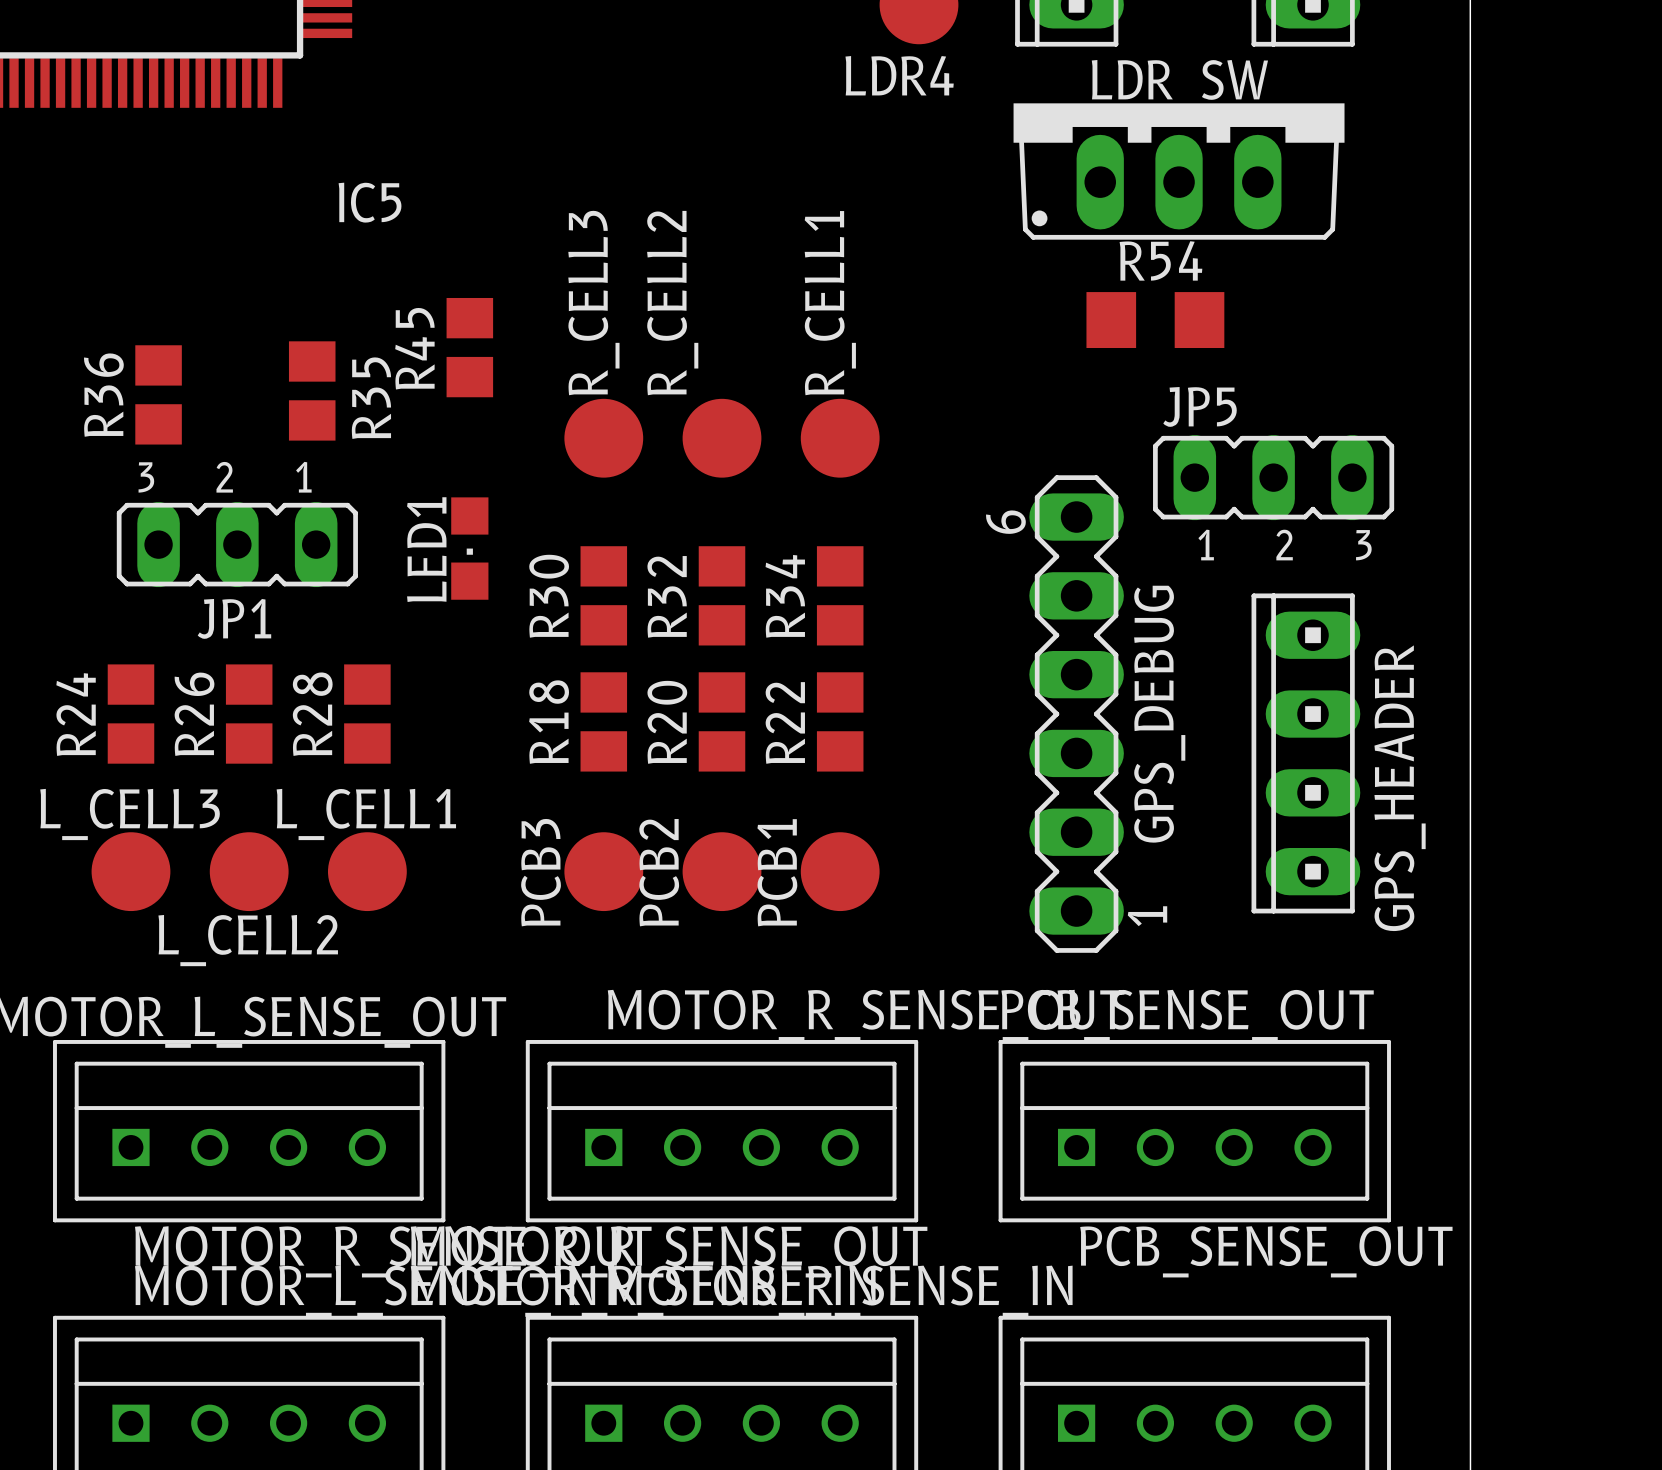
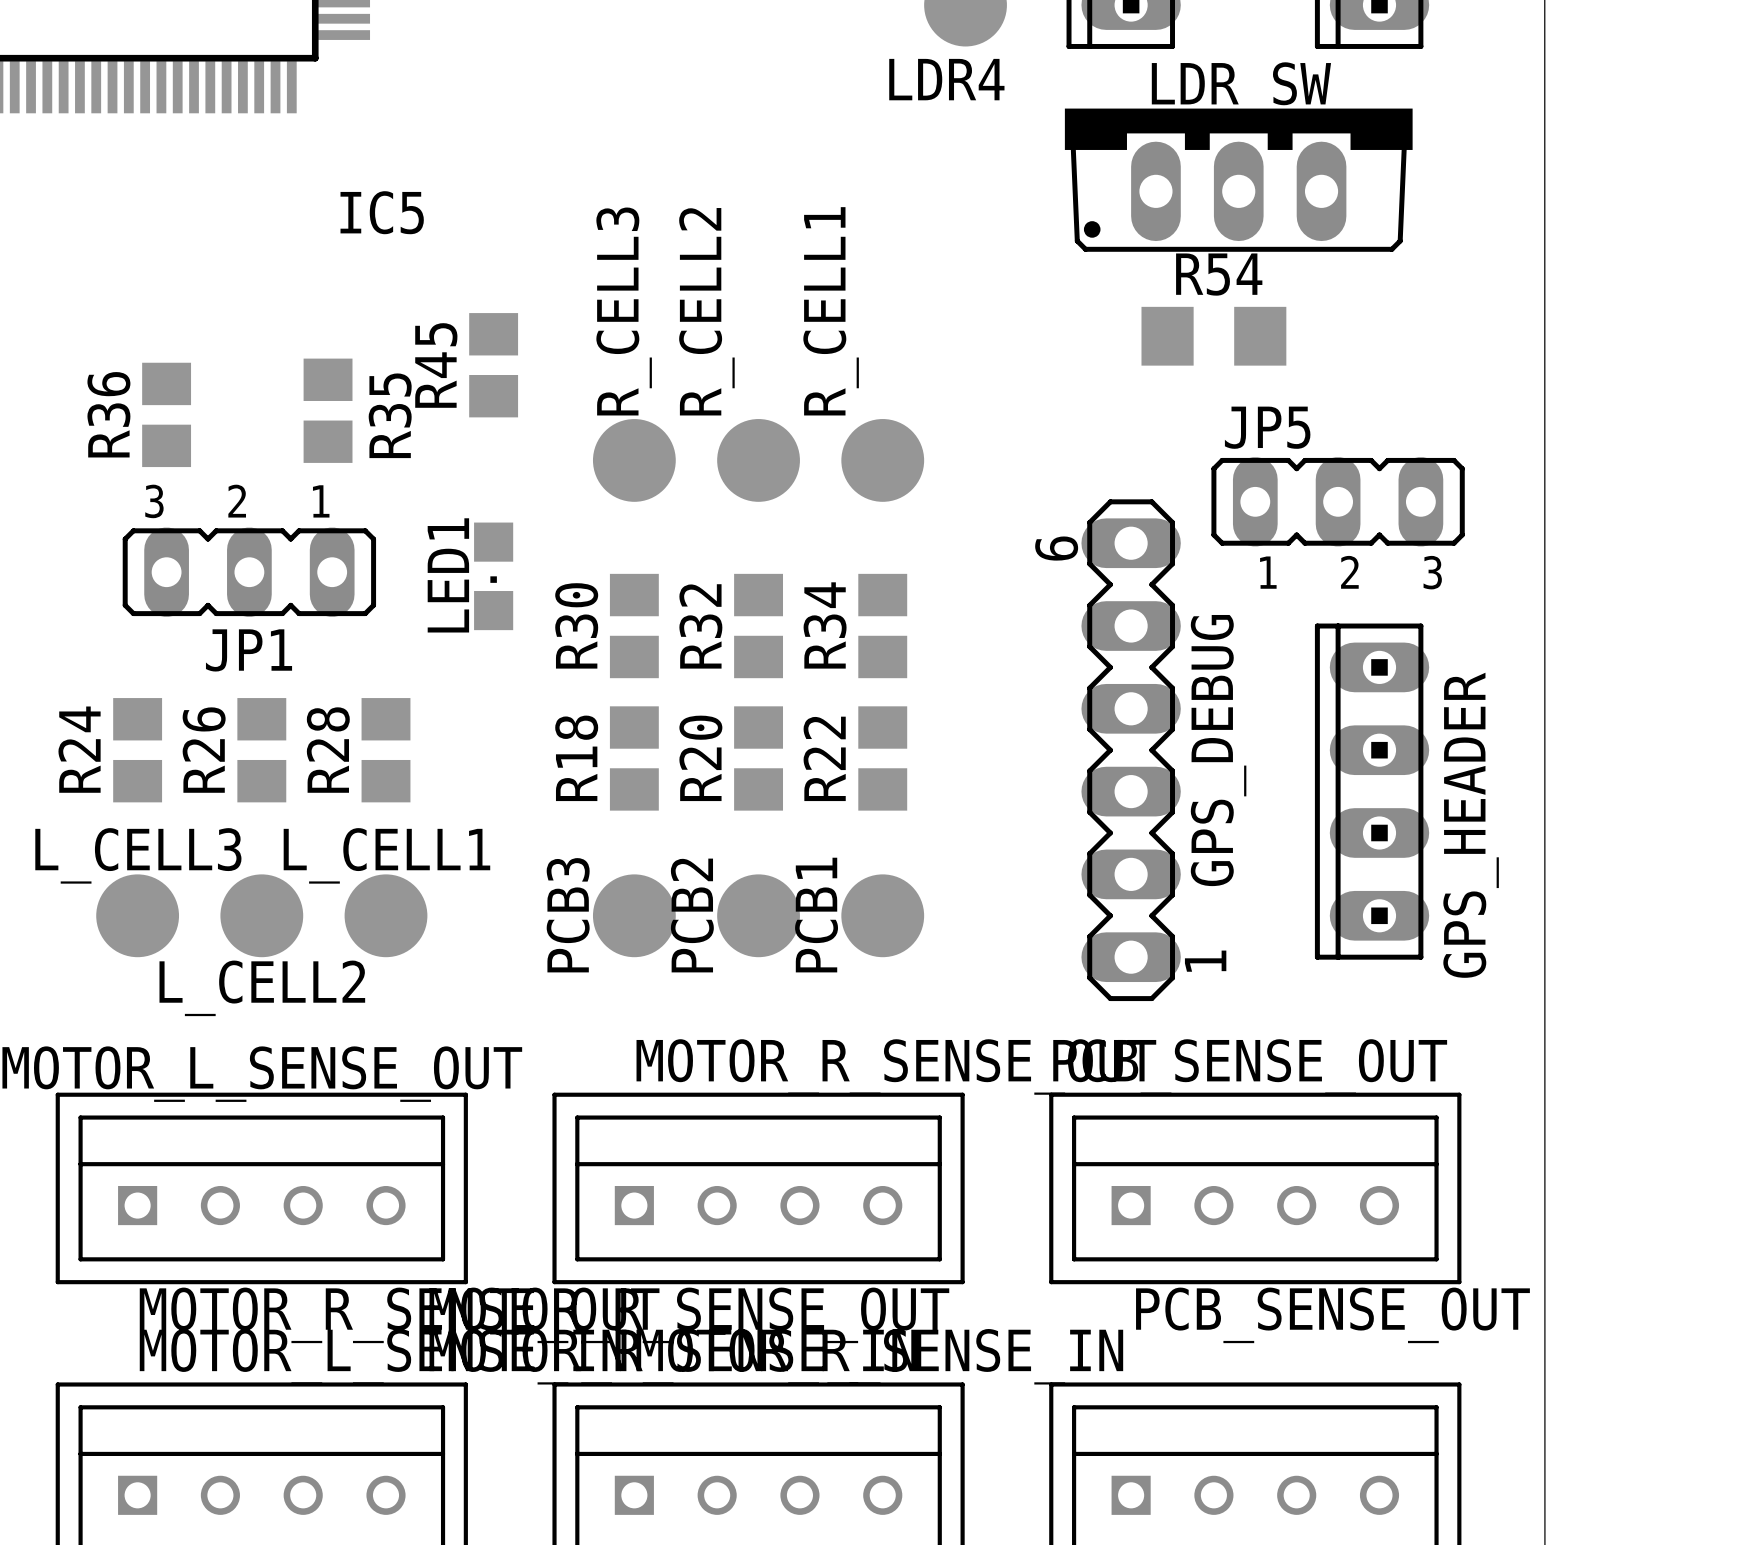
R_CELL1 name position: R_CELL1 (830, 303) -> R_CELL1 (831, 311)

